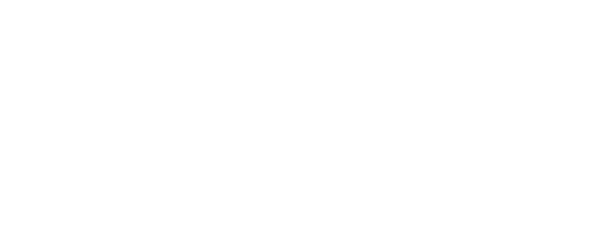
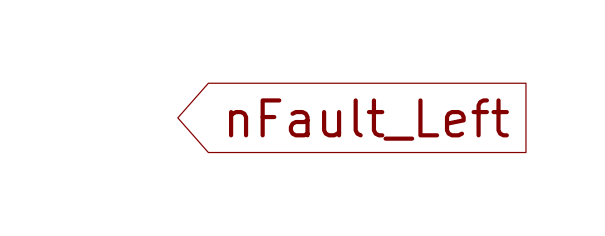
global label: none -> nFault_Left (368, 119)

